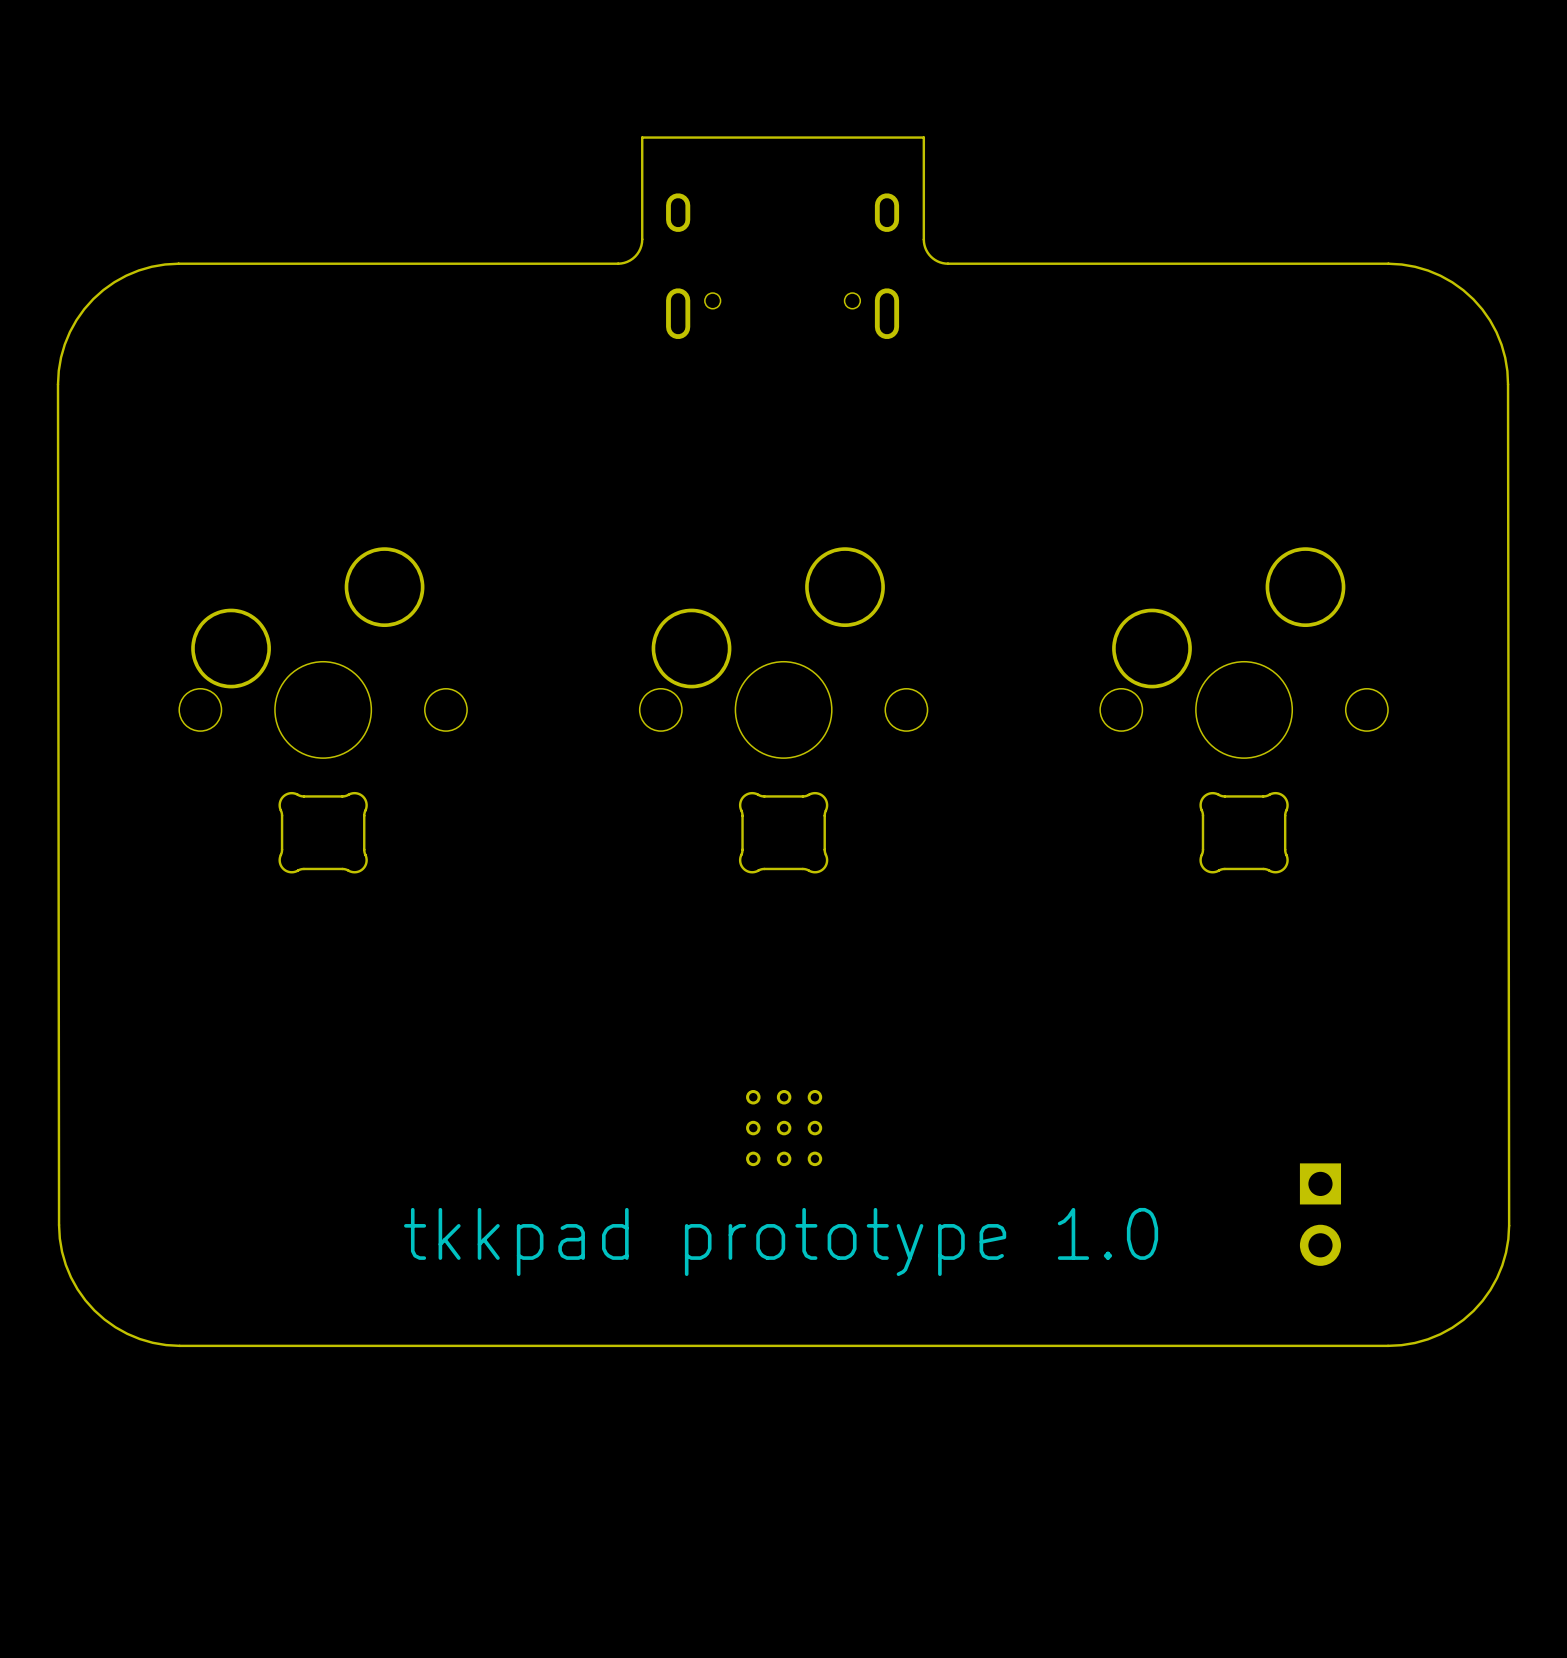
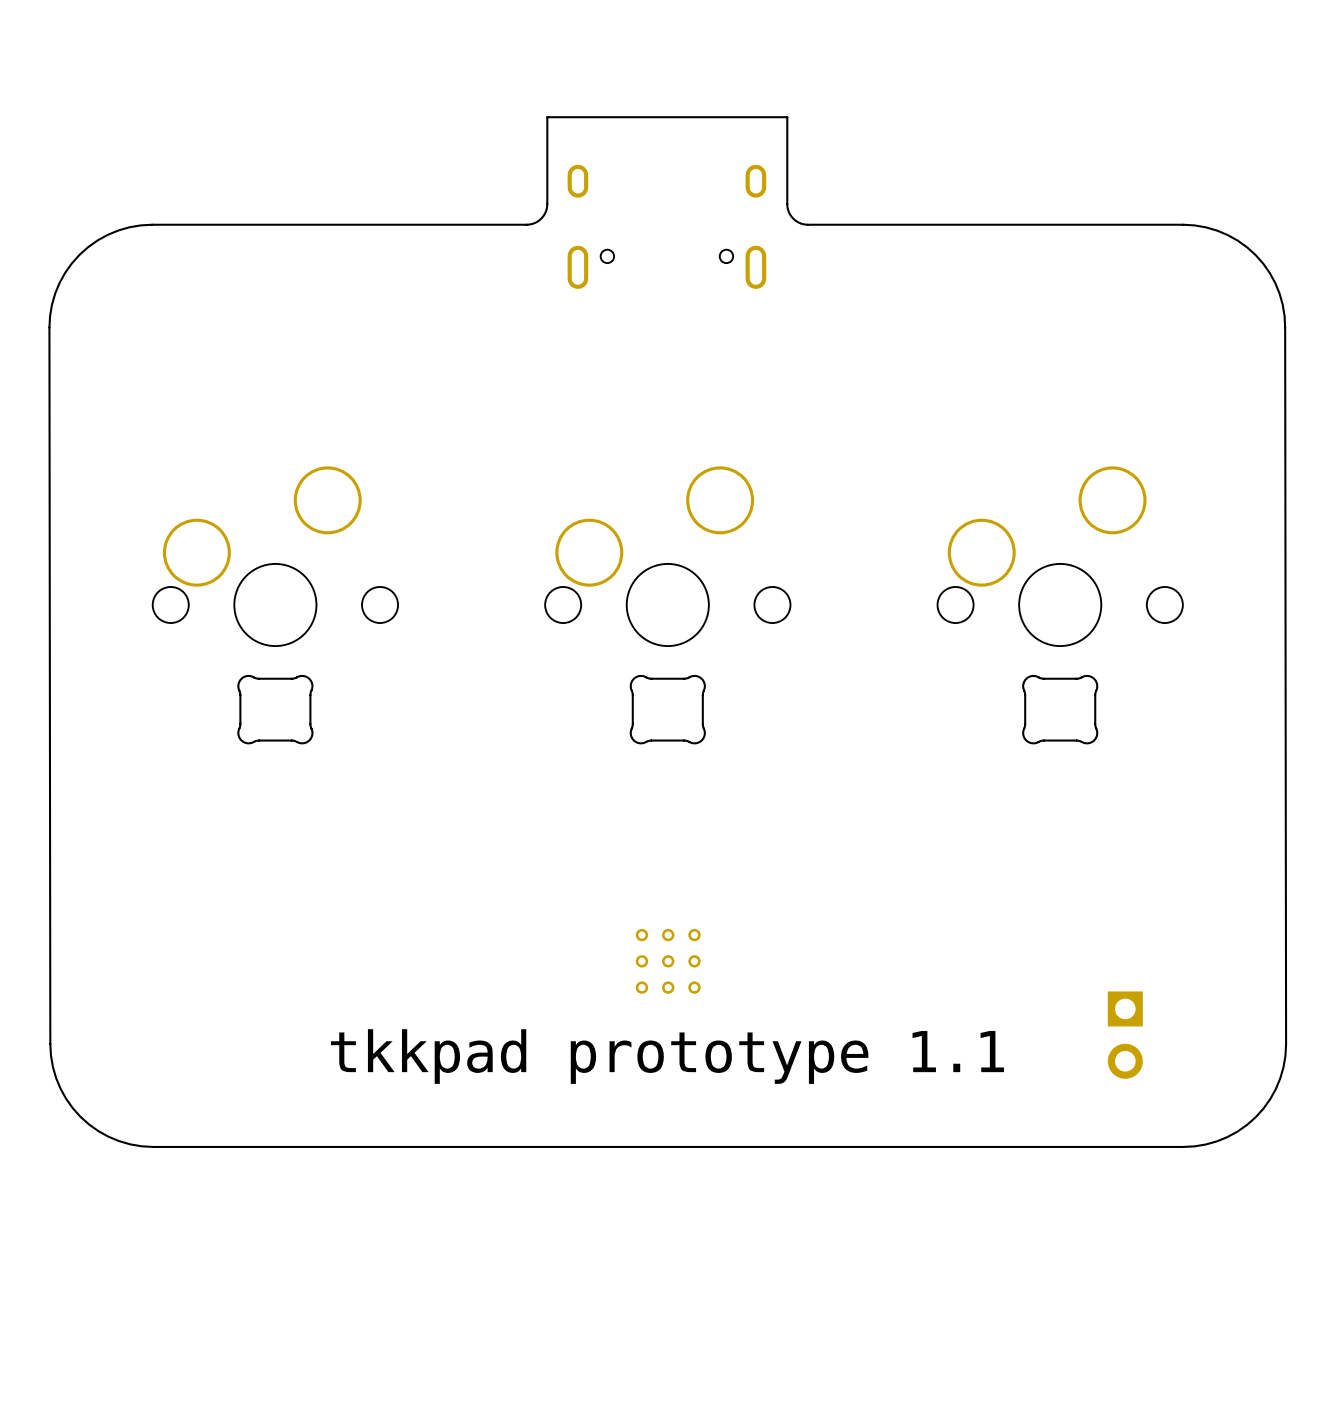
text: tkkpad prototype 1.0 (781, 1241) -> tkkpad prototype 1.1 (667, 1056)

